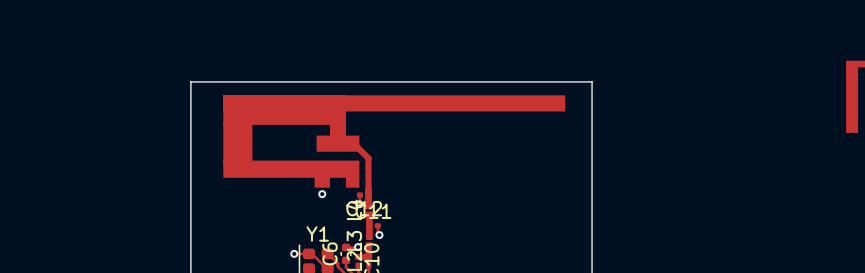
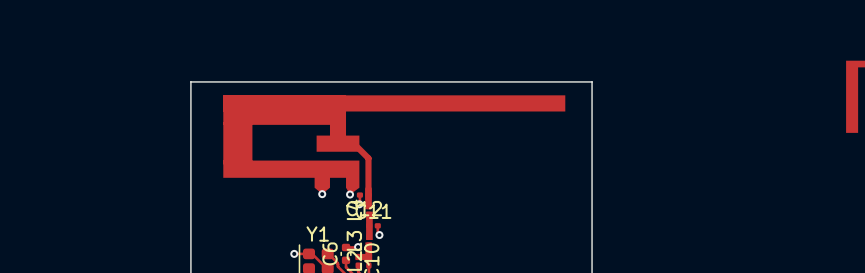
drawing: none -> [314, 187, 360, 195]
via: none -> (350, 194)

